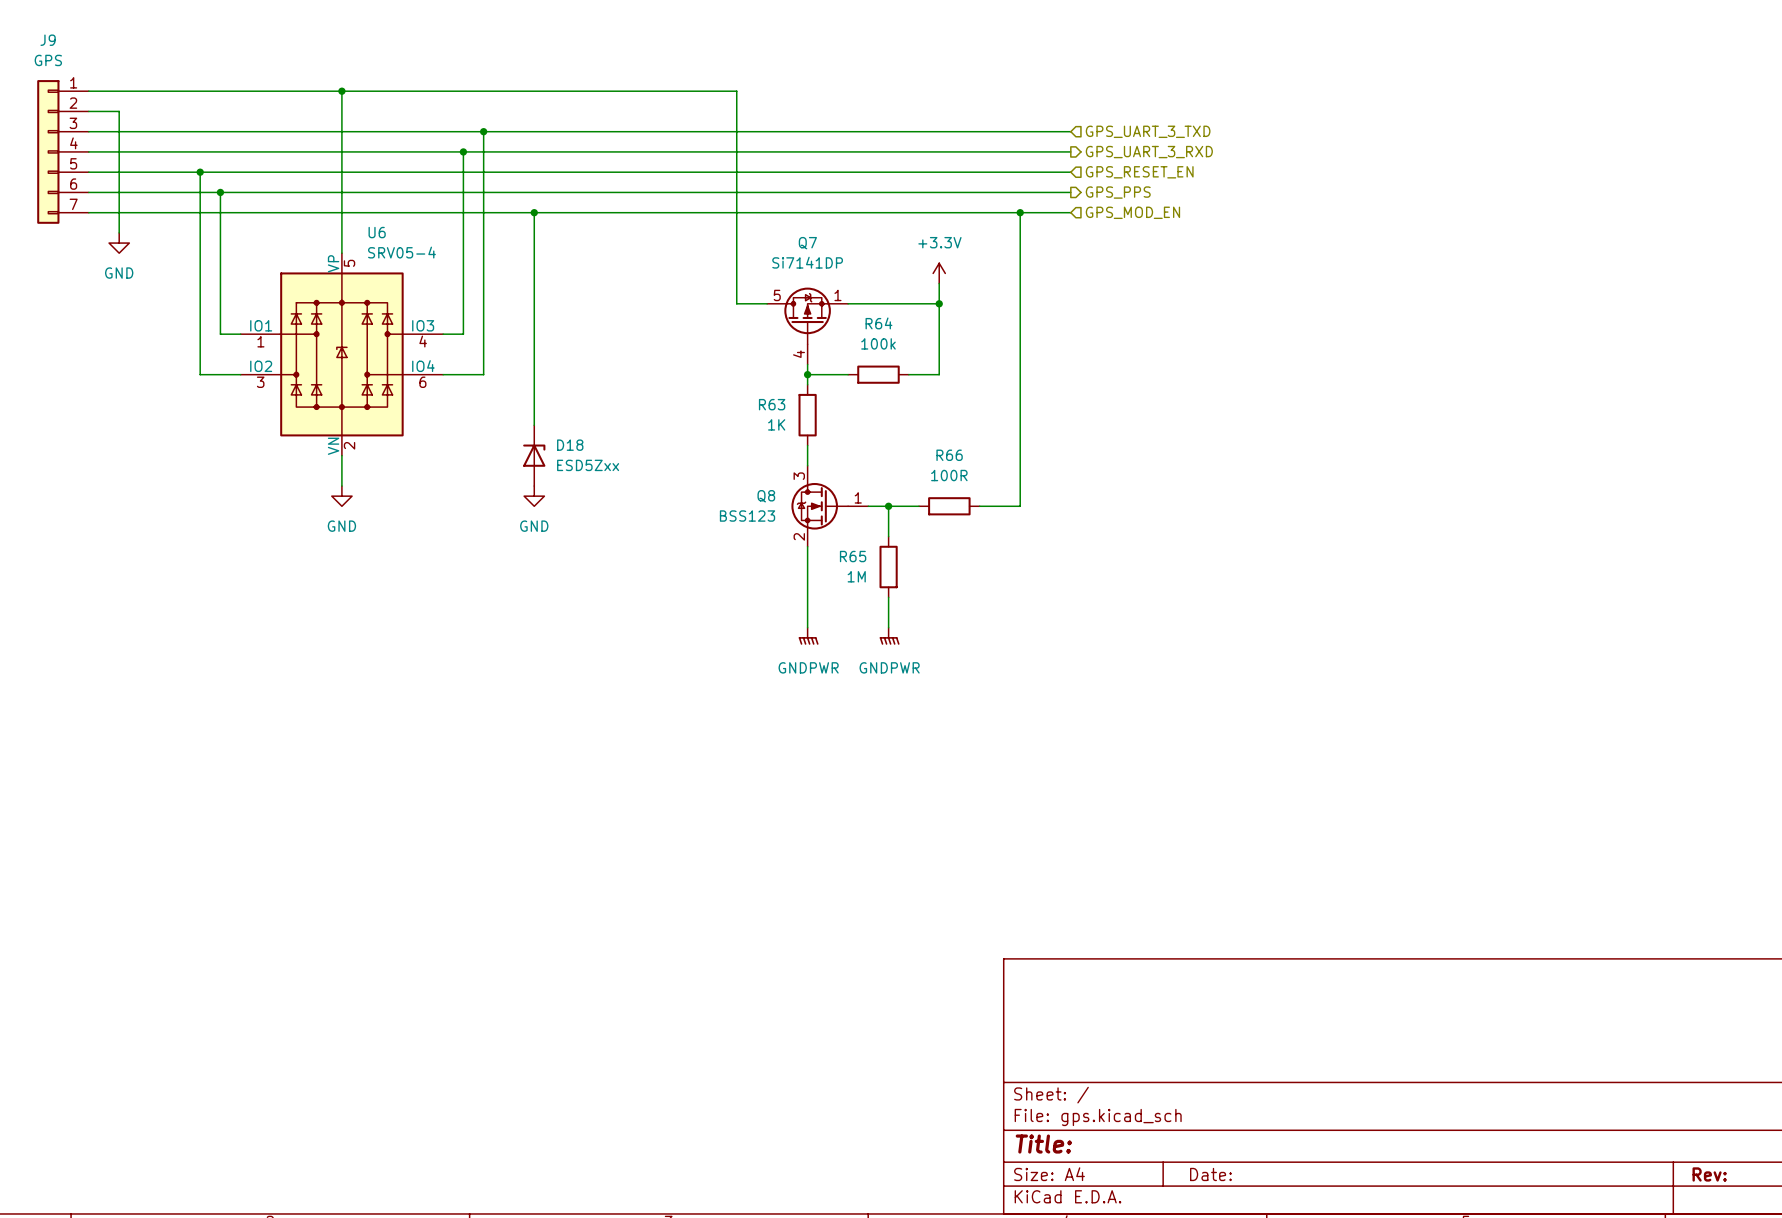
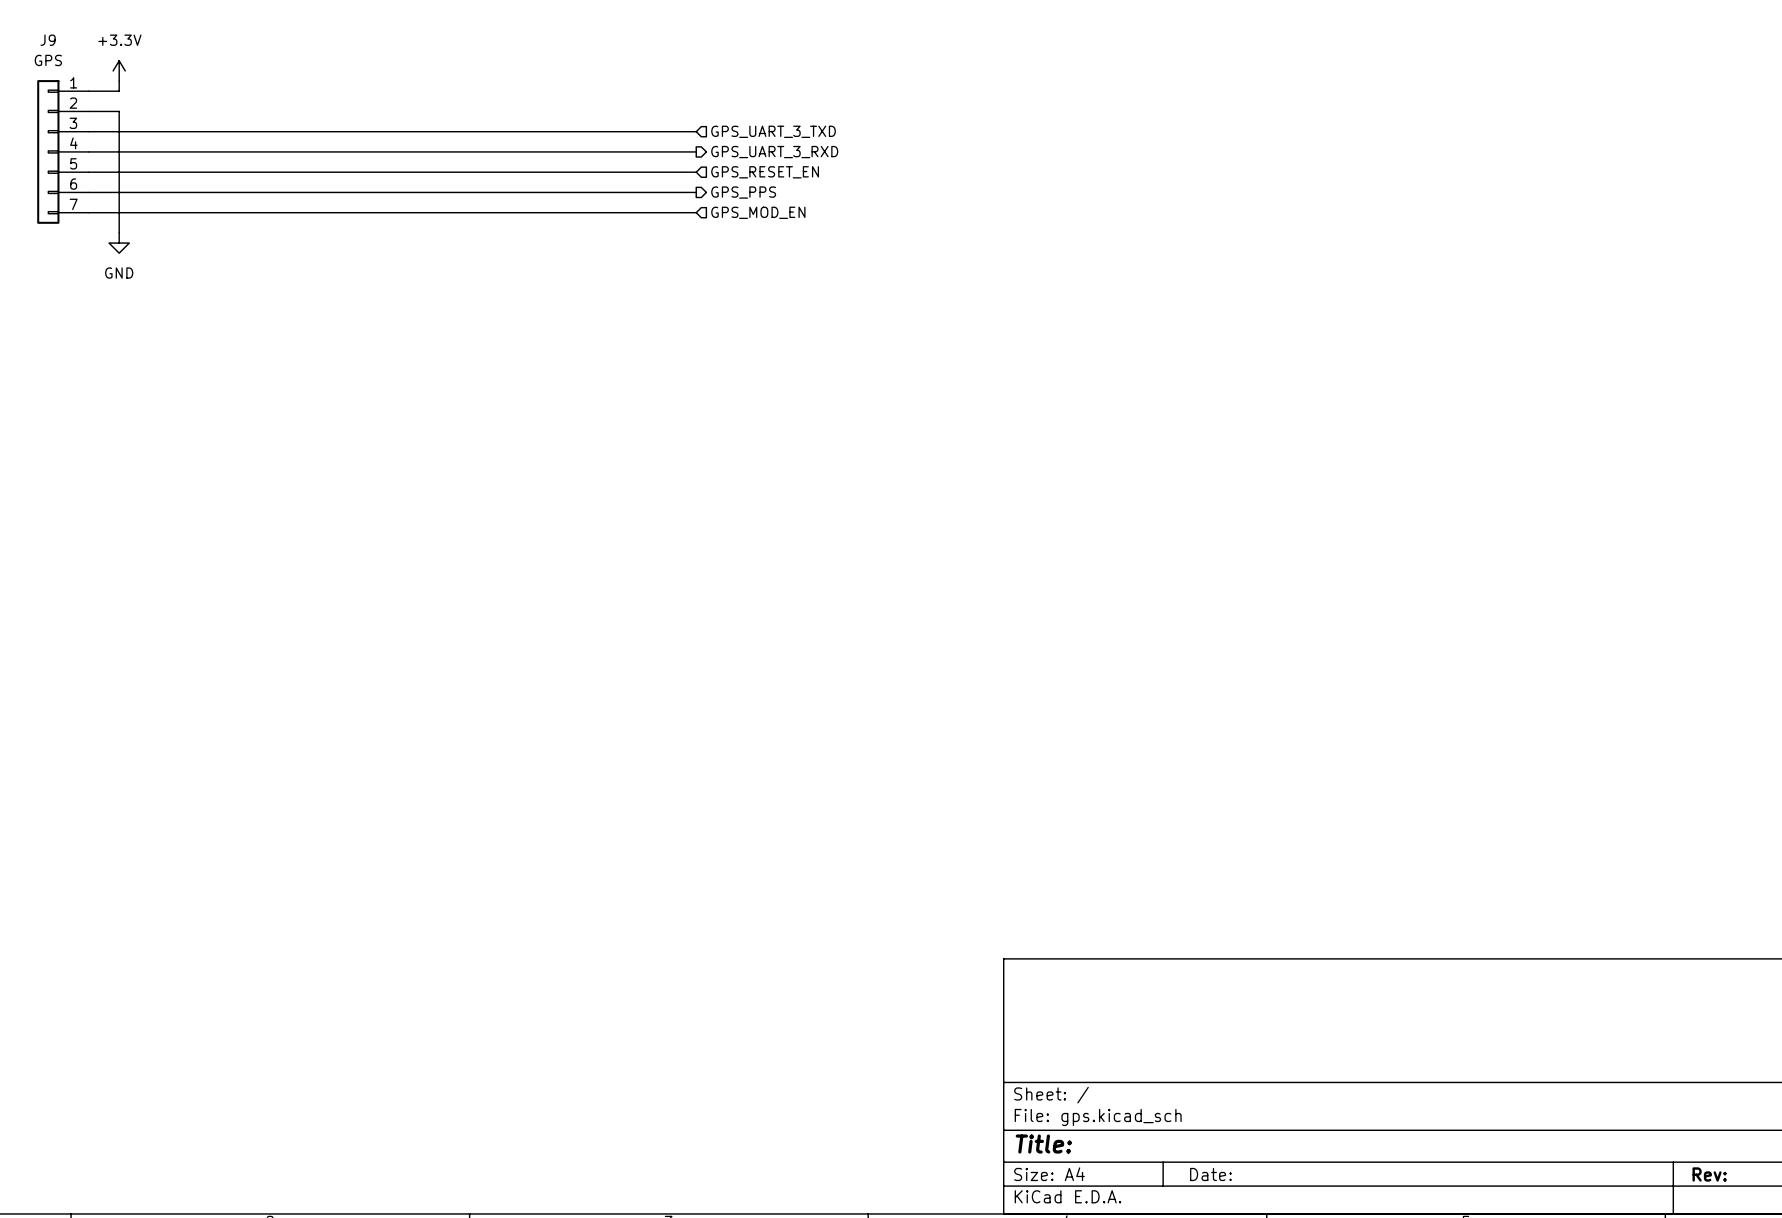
power symbol: none -> +3.3V (119, 70)
wire: (119, 91) (736, 91) (736, 303) (767, 303) -> (119, 91) (119, 81)
wire: (341, 91) (341, 253) -> none
junction: (341, 91) -> none
wire: (483, 131) (483, 374) (443, 374) -> none
junction: (483, 131) -> none
wire: (696, 131) (1070, 131) -> none
hierarchical label: none -> GPS_UART_3_TXD (773, 131)
hierarchical label: GPS_UART_3_TXD (1148, 131) -> none
wire: (463, 151) (463, 334) (443, 334) -> none
junction: (463, 151) -> none
wire: (696, 151) (1070, 151) -> none
hierarchical label: none -> GPS_UART_3_RXD (774, 152)
hierarchical label: GPS_UART_3_RXD (1149, 152) -> none
wire: (200, 172) (200, 374) (240, 374) -> none
junction: (200, 172) -> none
wire: (696, 172) (1070, 172) -> none
hierarchical label: none -> GPS_RESET_EN (765, 172)
hierarchical label: GPS_RESET_EN (1139, 172) -> none
wire: (220, 192) (220, 334) (240, 334) -> none
junction: (220, 192) -> none
wire: (696, 192) (1070, 192) -> none
hierarchical label: none -> GPS_PPS (743, 192)
hierarchical label: GPS_PPS (1118, 192) -> none
wire: (534, 212) (534, 425) -> none
junction: (534, 212) -> none
wire: (696, 212) (1070, 212) -> none
hierarchical label: none -> GPS_MOD_EN (758, 212)
wire: (1020, 212) (1020, 506) (979, 506) -> none
junction: (1020, 212) -> none
hierarchical label: GPS_MOD_EN (1132, 212) -> none
power symbol: +3.3V (939, 273) -> none
wire: (939, 283) (939, 374) (908, 374) -> none
wire: (848, 303) (939, 303) -> none
junction: (939, 303) -> none
Q7: Si7141DP (807, 326) -> none
U6: SRV05-4 (341, 354) -> none
wire: (807, 364) (807, 384) -> none
wire: (807, 374) (848, 374) -> none
junction: (807, 374) -> none
R64: 100k (878, 374) -> none
R63: 1K (807, 415) -> none
wire: (807, 445) (807, 465) -> none
wire: (341, 455) (341, 486) -> none
D18: ESD5Zxx (534, 455) -> none
power symbol: GND (341, 496) -> none
power symbol: GND (534, 496) -> none
Q8: BSS123 (829, 506) -> none
wire: (868, 506) (918, 506) -> none
wire: (888, 506) (888, 536) -> none
junction: (888, 506) -> none
R66: 100R (949, 506) -> none
wire: (807, 546) (807, 627) -> none
R65: 1M (888, 567) -> none
wire: (888, 597) (888, 627) -> none
power symbol: GNDPWR (808, 636) -> none
power symbol: GNDPWR (889, 636) -> none

